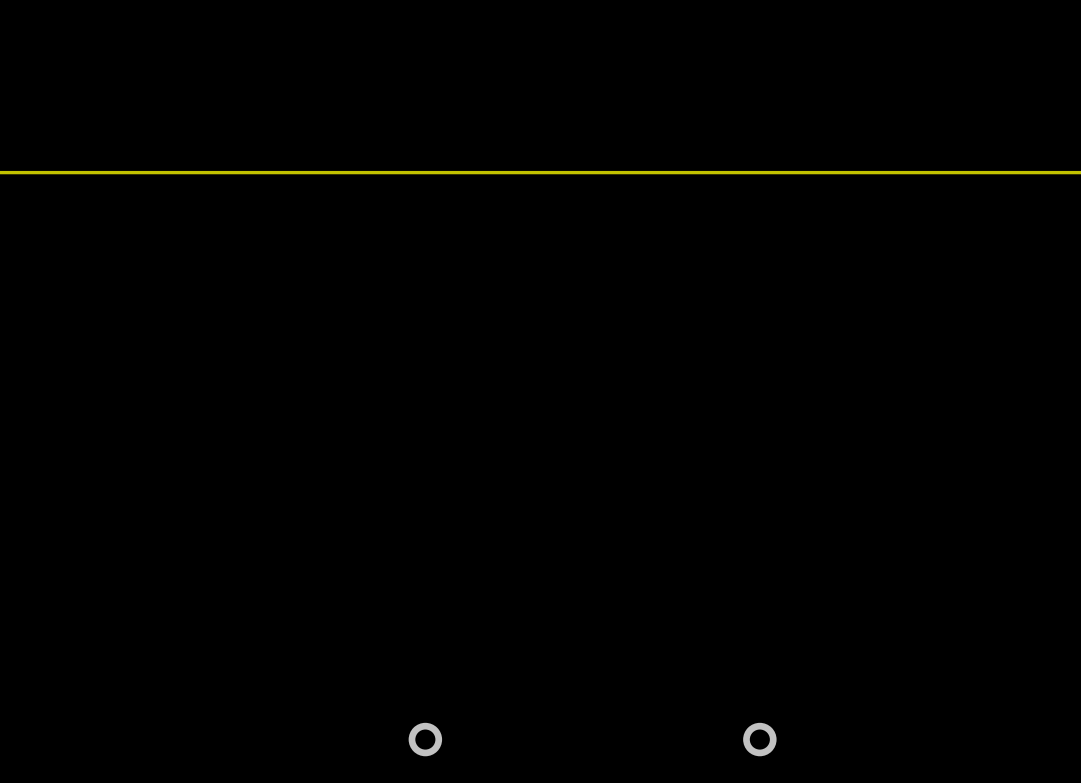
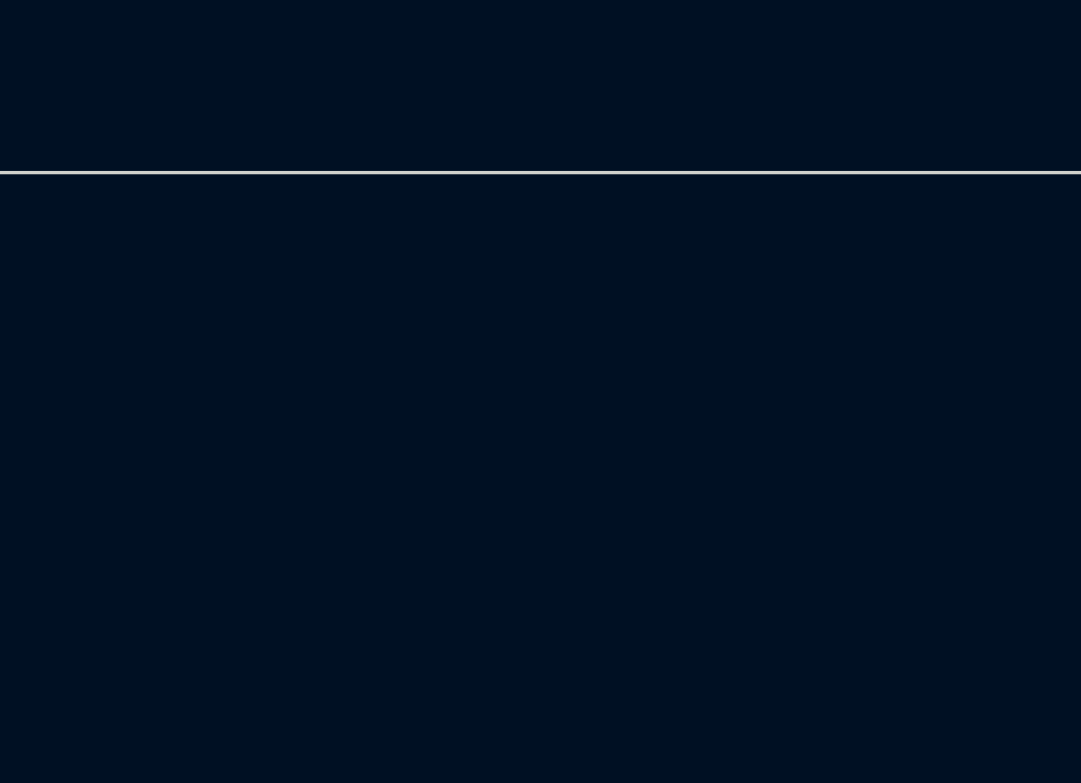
via: (425, 739) -> none
via: (759, 739) -> none

